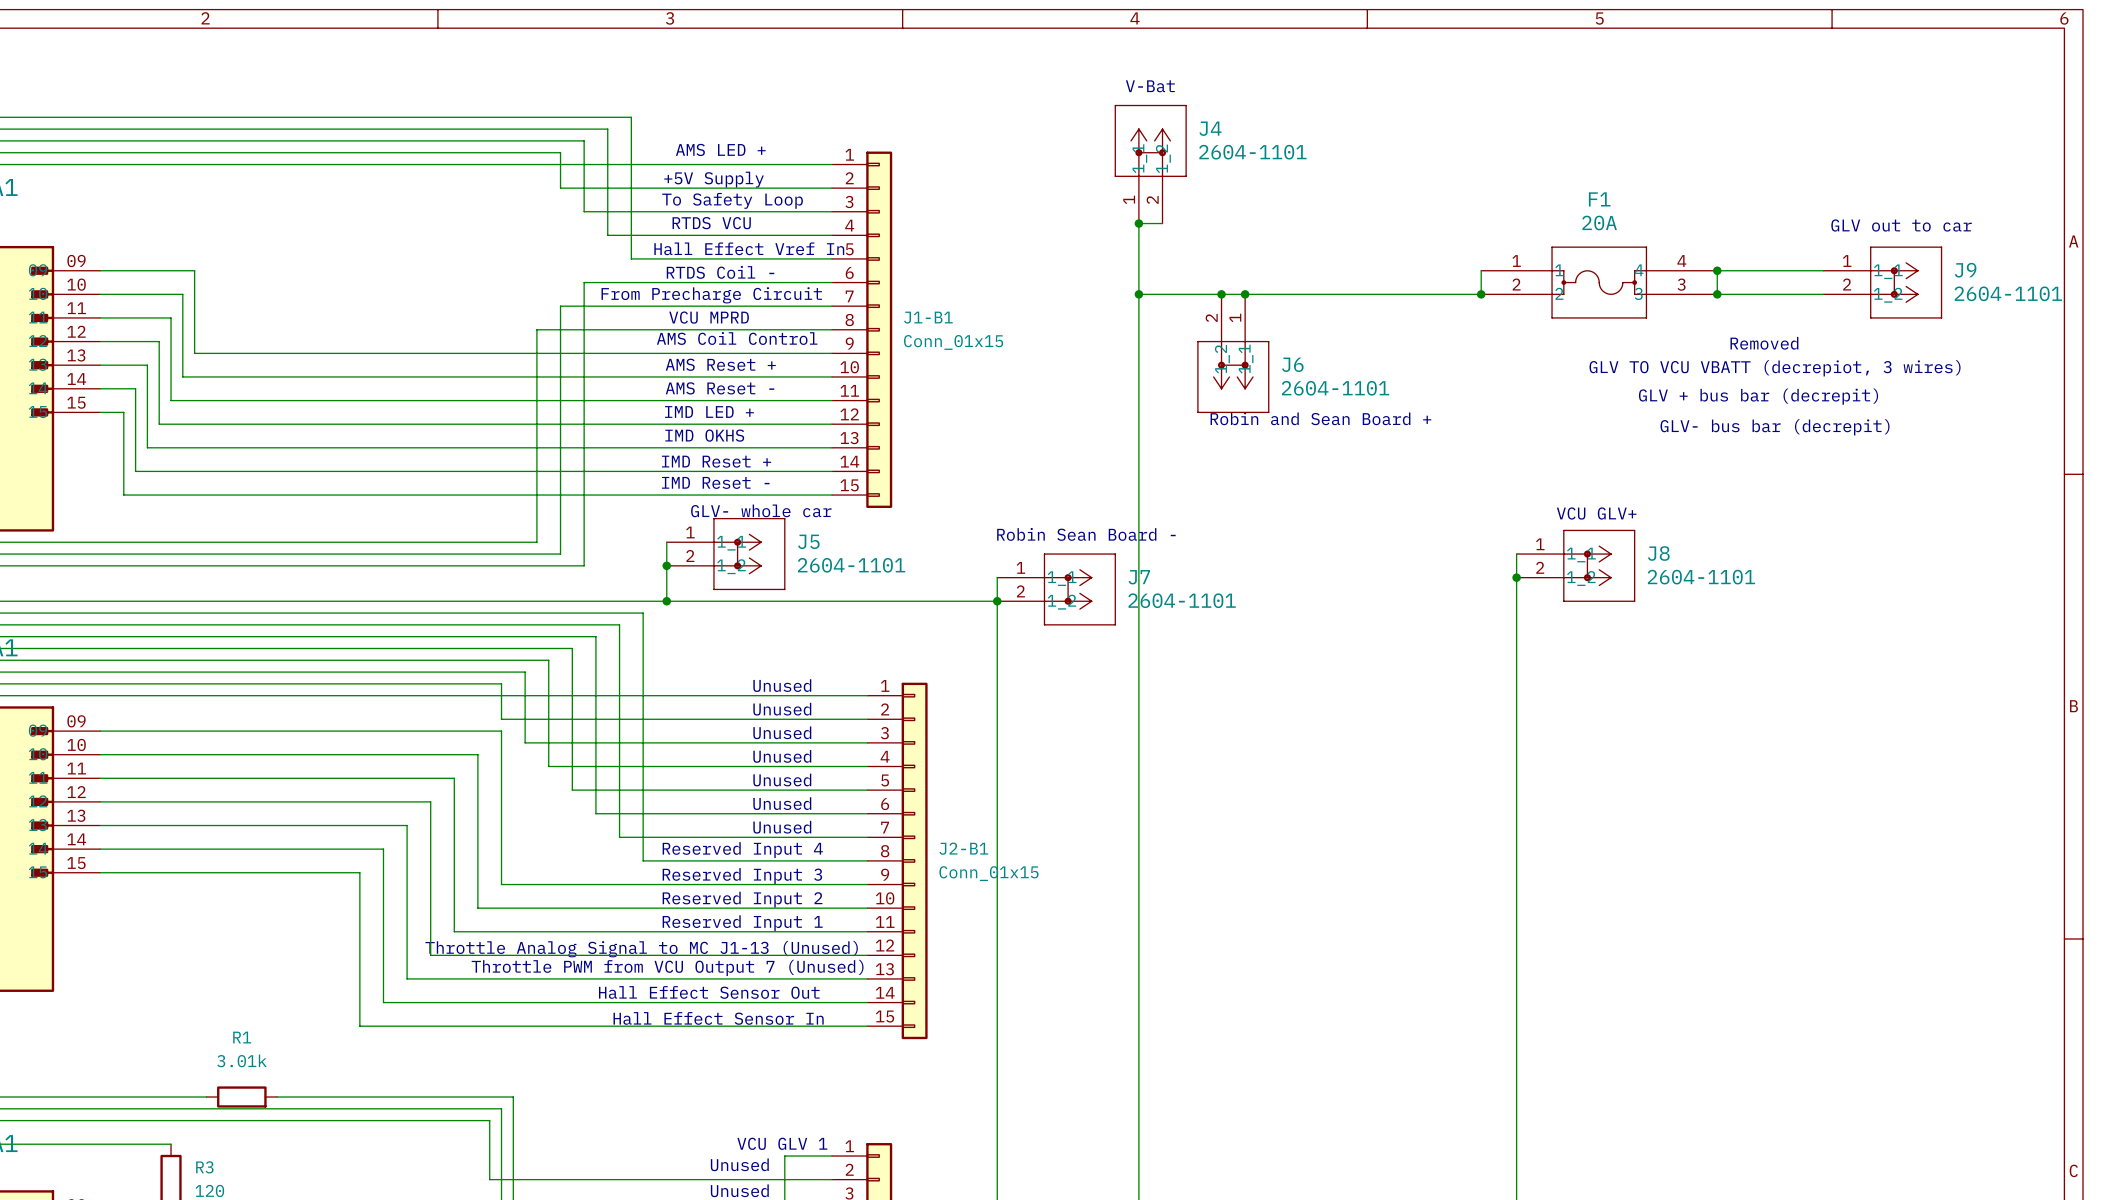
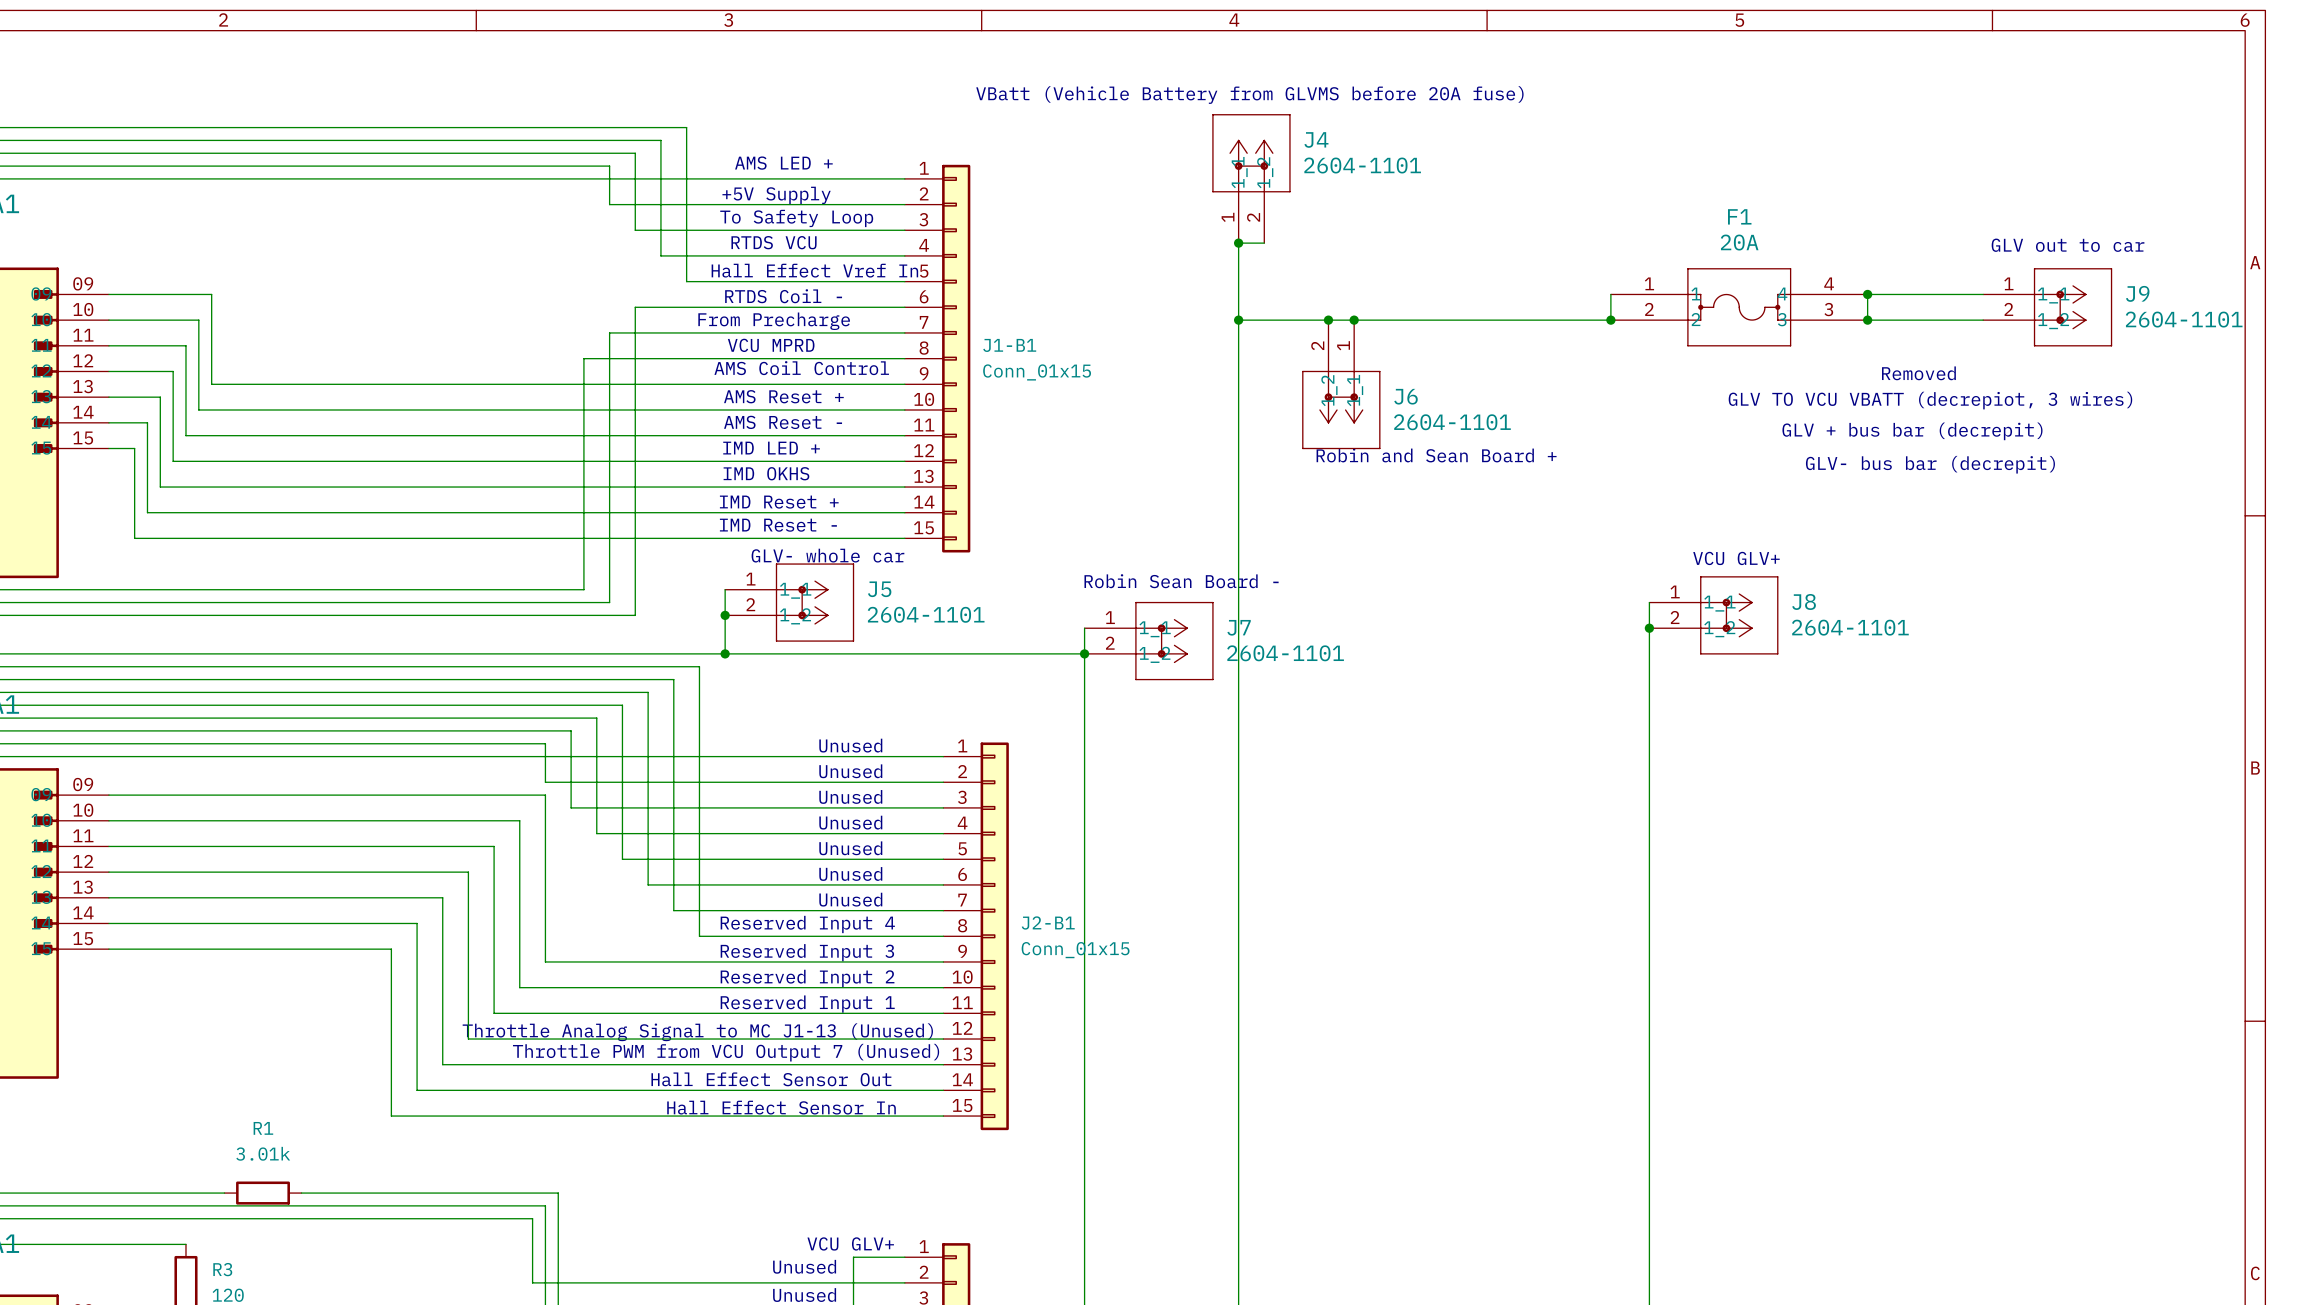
text: V-Bat (1150, 86) -> VBatt (Vehicle Battery from GLVMS before 20A fuse) (1249, 95)
text: From Precharge Circuit (711, 295) -> From Precharge (774, 321)
text: VCU GLV 1 (782, 1143) -> VCU GLV+ (850, 1243)

